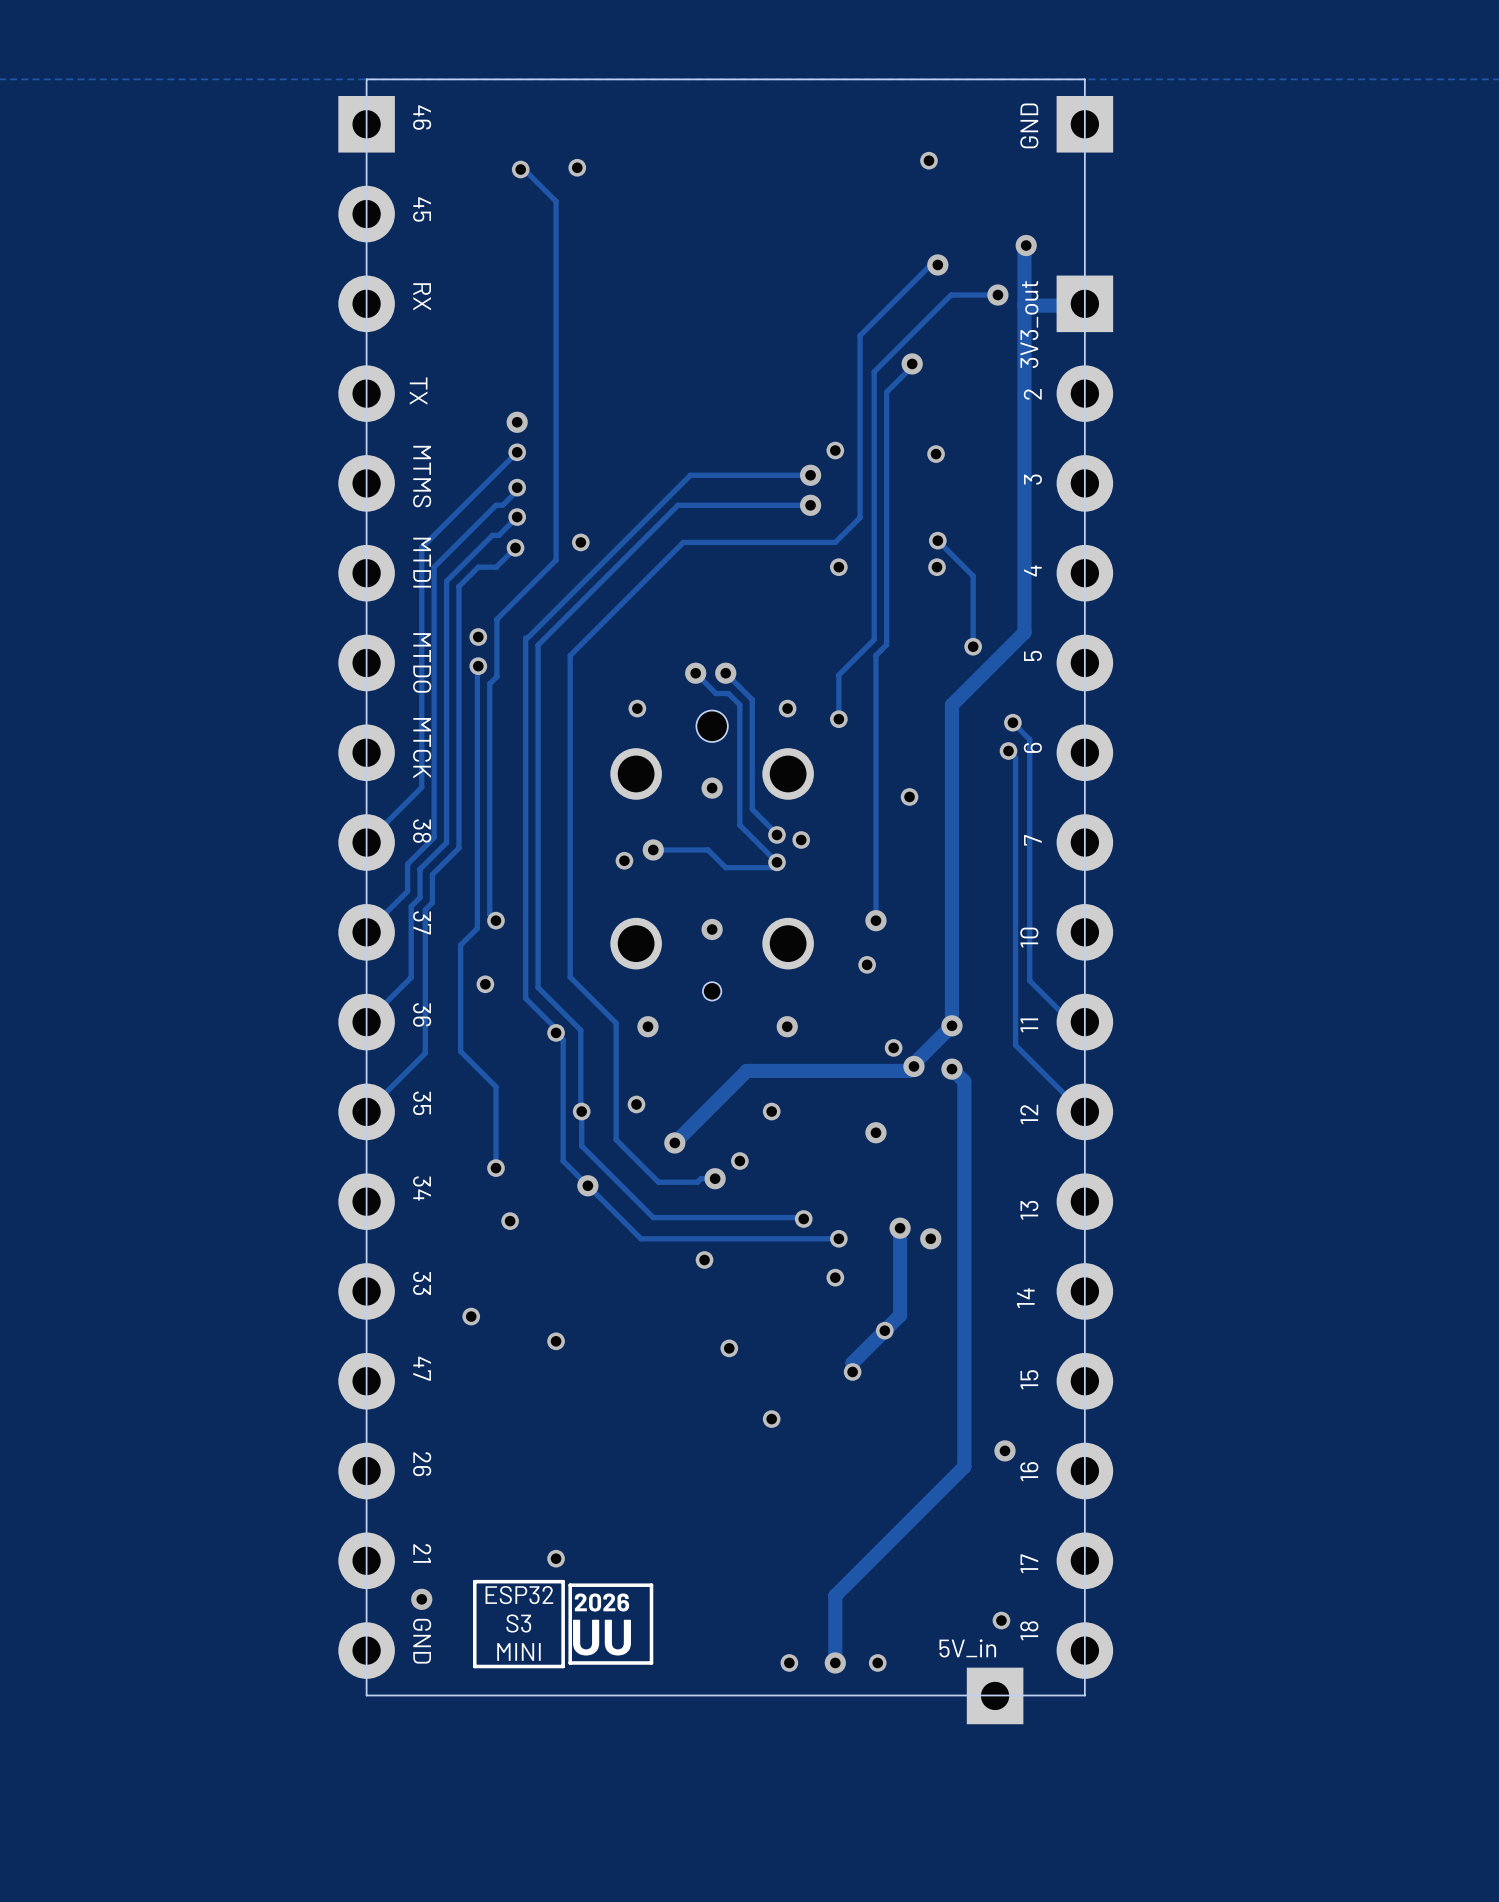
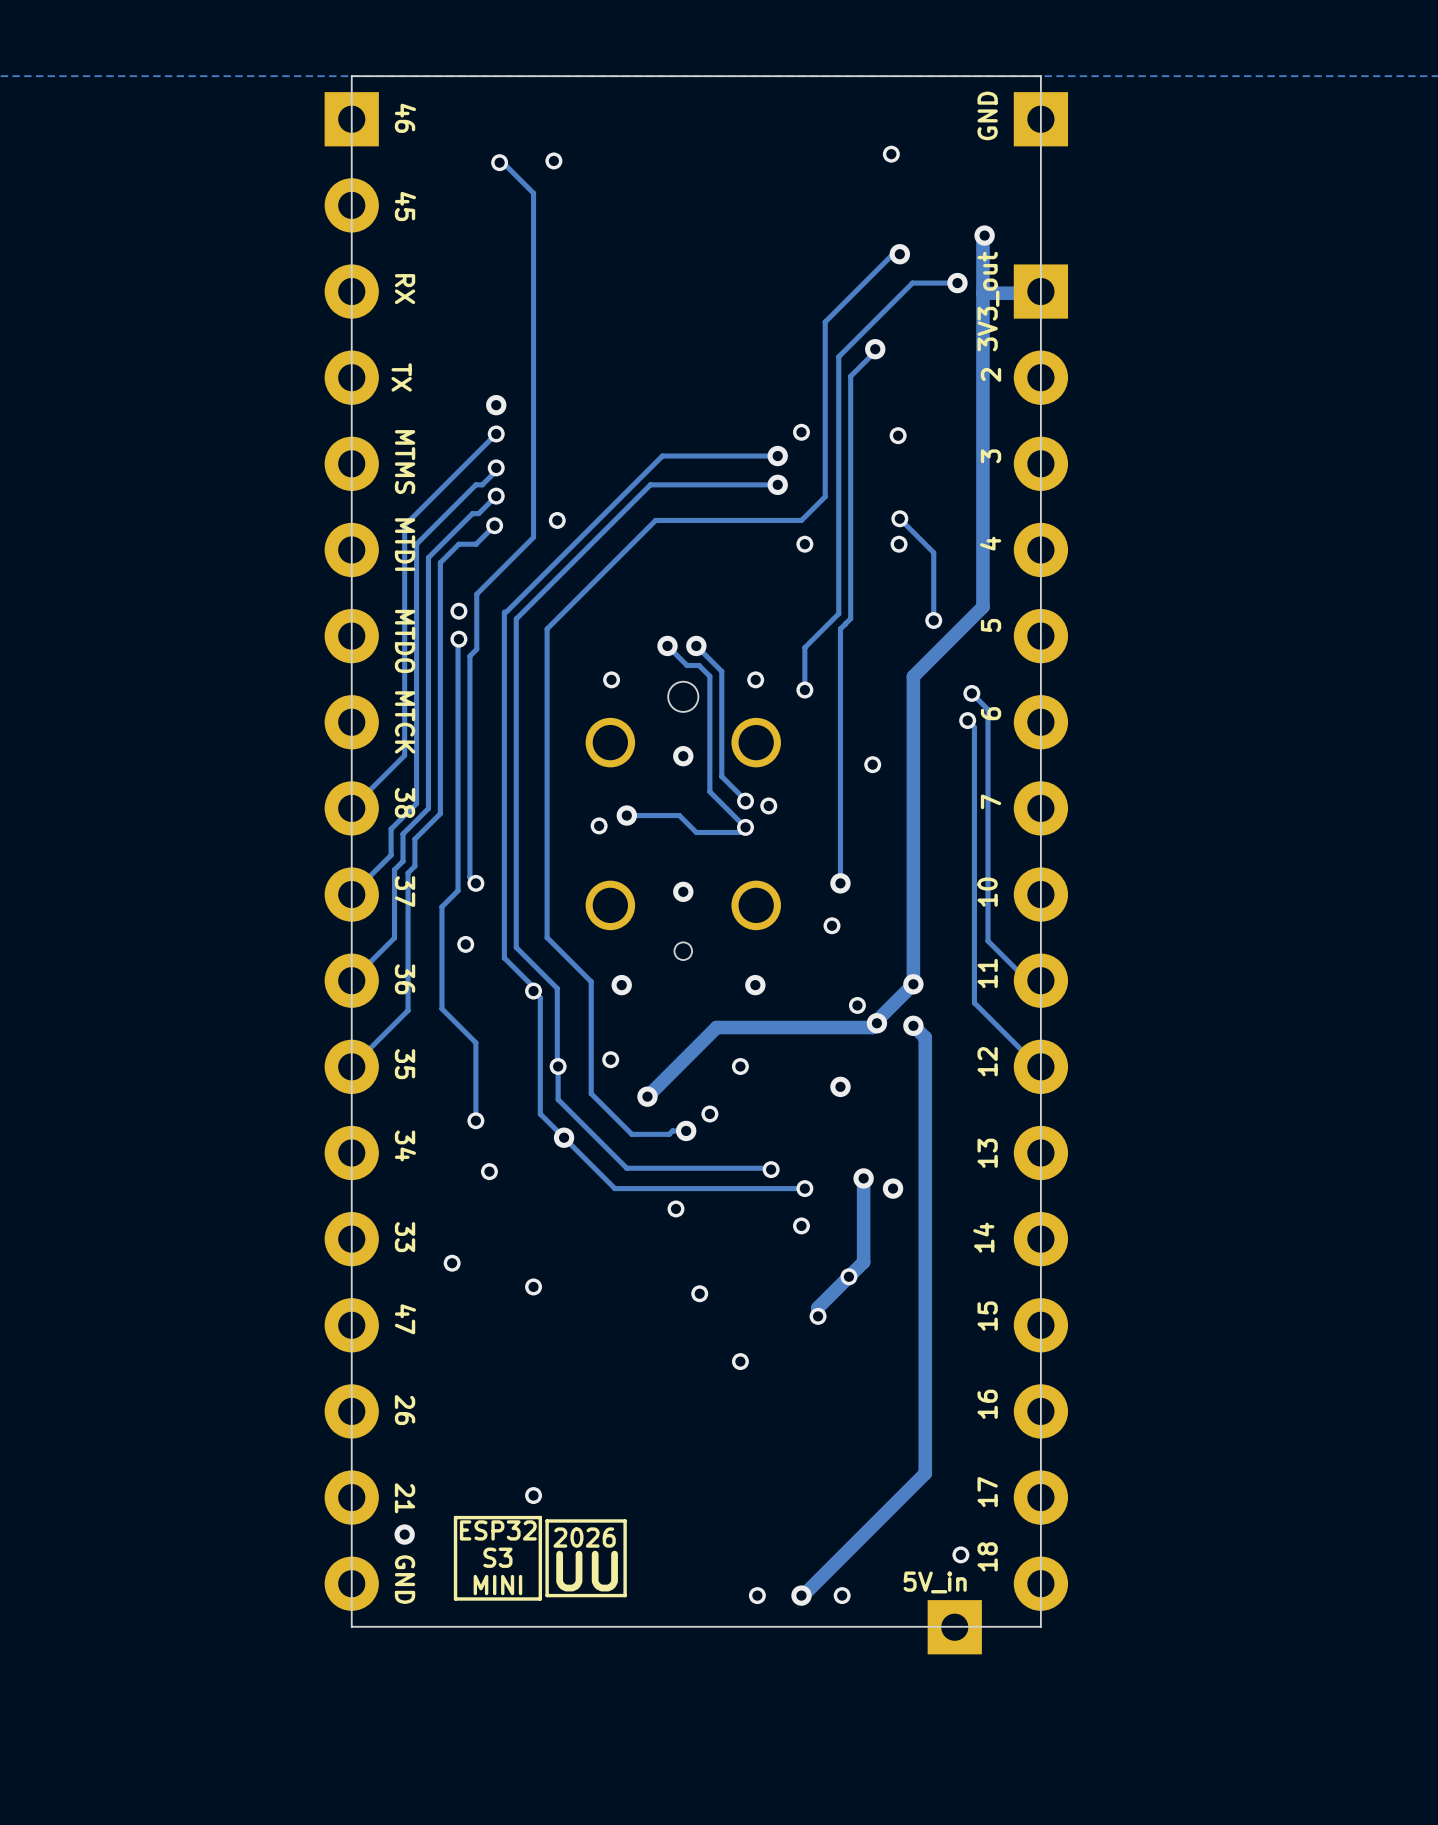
via: (1004, 1450) -> none
track: (964, 1466) (835, 1595) (835, 1662) -> (925, 1407) (925, 1473) (801, 1595)

